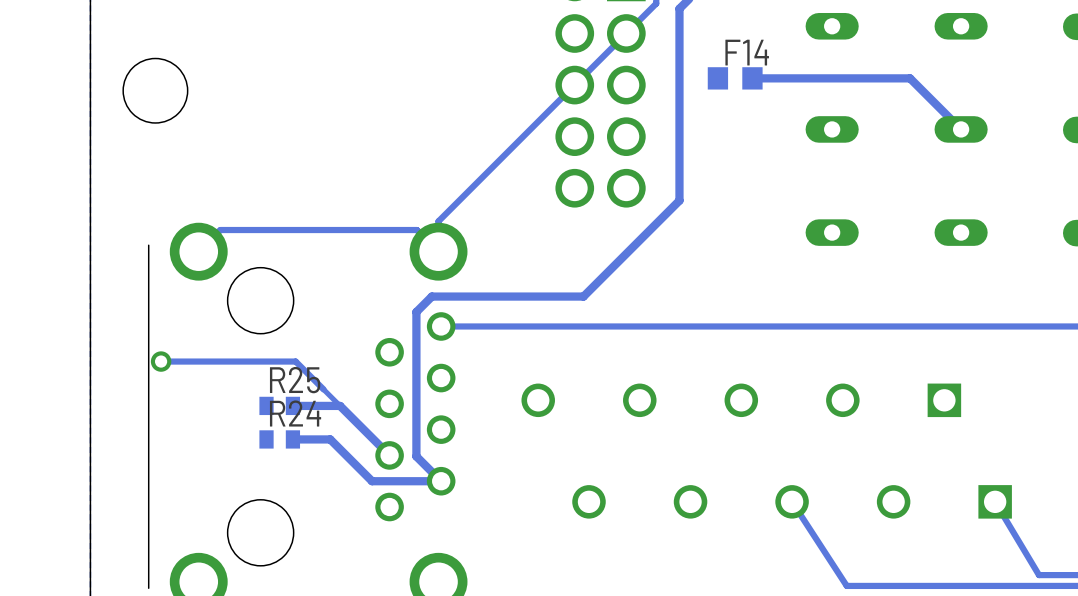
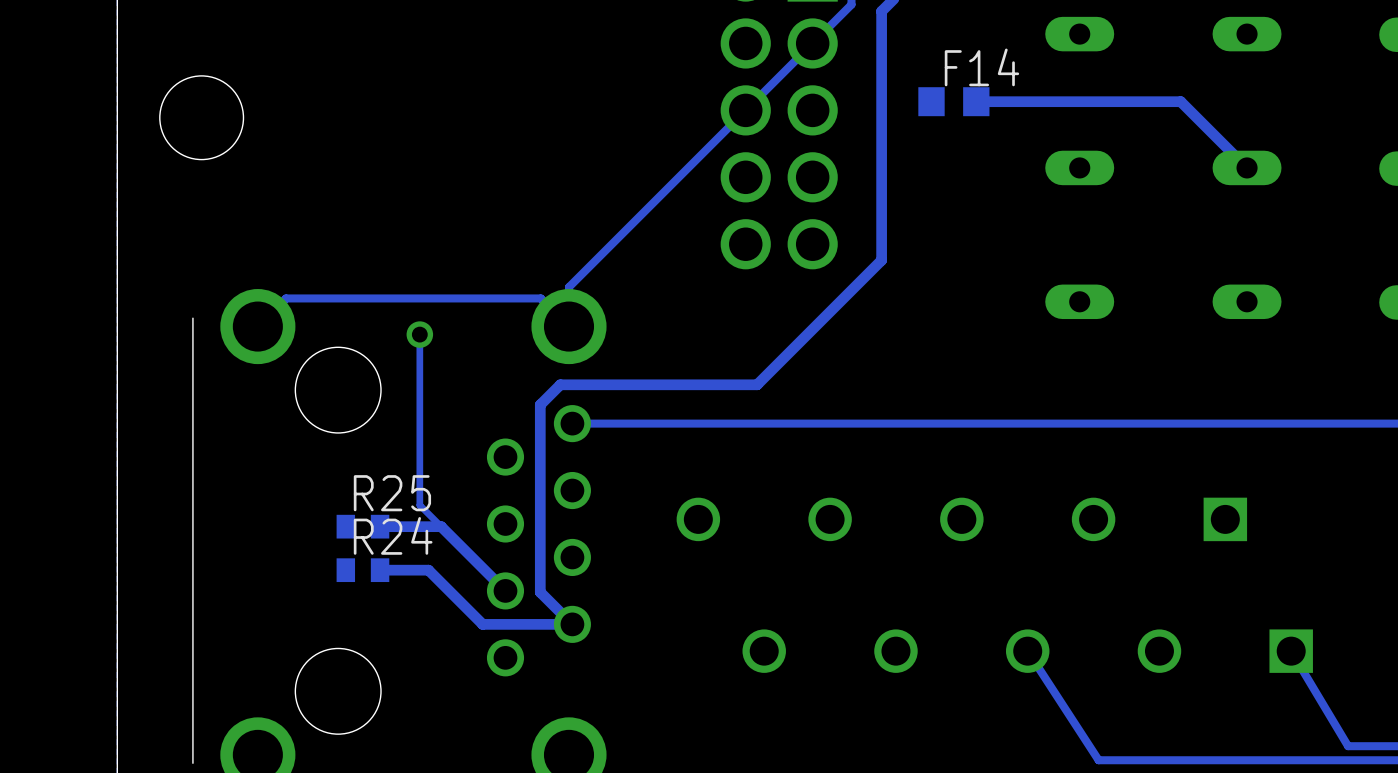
via: none -> (419, 334)
track: (161, 361) (295, 361) (323, 389) -> (419, 334) (419, 505)
via: (161, 361) -> none

